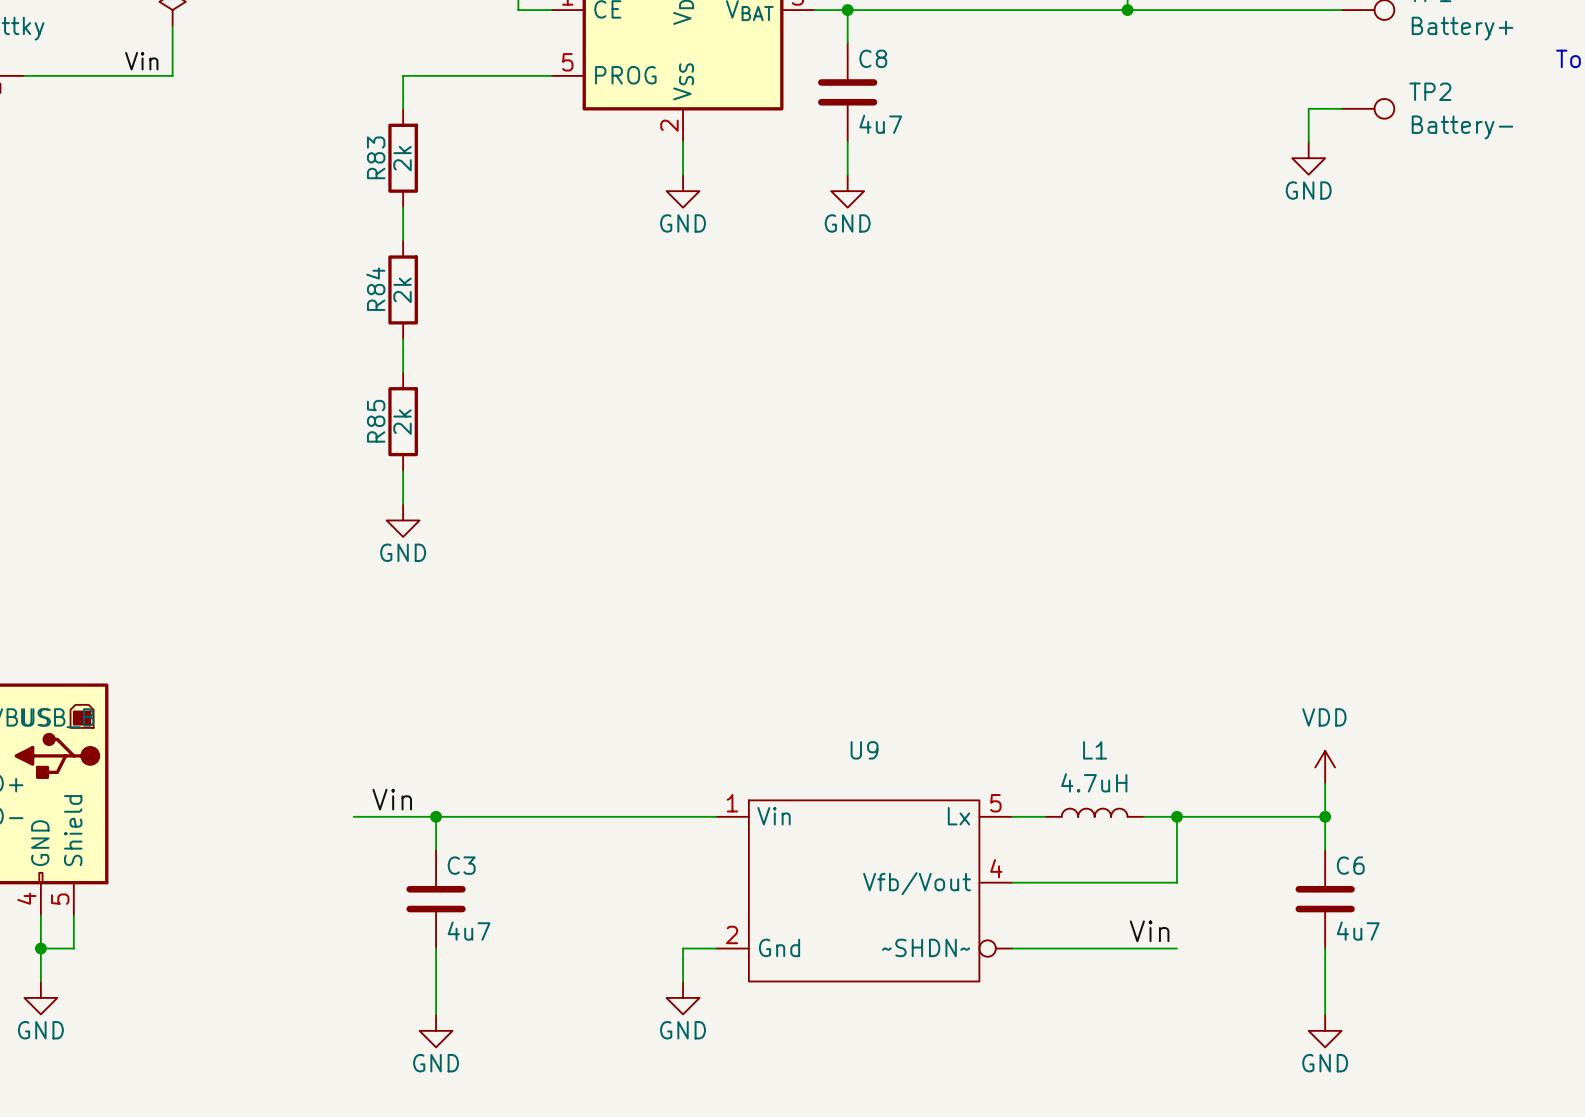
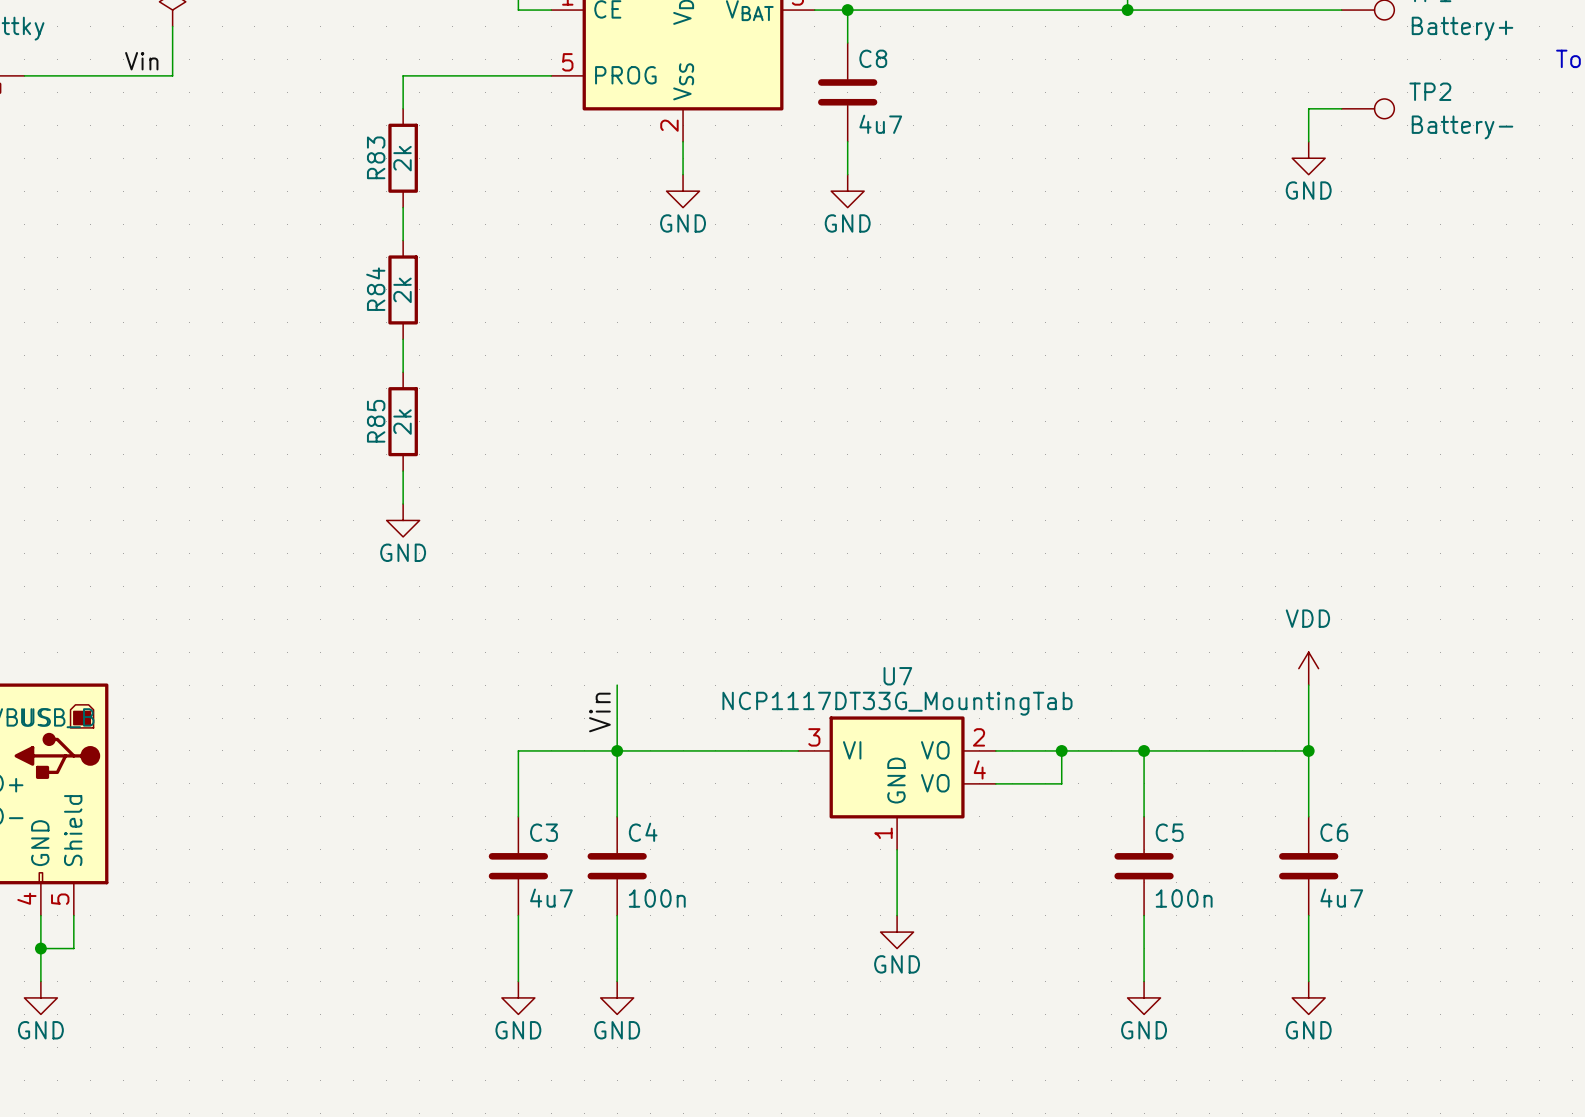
wire: none -> (617, 685) (617, 816)
wire: none -> (1308, 685) (1308, 816)
junction: none -> (617, 750)
wire: none -> (798, 750) (518, 750) (518, 816)
wire: none -> (995, 750) (1308, 750)
wire: none -> (1061, 750) (1061, 783) (995, 783)
junction: none -> (1061, 750)
junction: none -> (1144, 750)
power symbol position: VDD (1325, 767) -> VDD (1308, 668)
U7: none -> NCP1117DT33G_MountingTab (897, 783)
wire: (1325, 783) (1325, 849) -> (1308, 915) (1308, 981)
label rotation: 0° (392, 799) -> 90° counterclockwise (599, 712)
label position: Vin (392, 799) -> Vin (599, 712)
L1: 4.7uH (1094, 812) -> none
wire: (353, 816) (715, 816) -> none
wire: (436, 816) (436, 849) -> none
junction: (436, 816) -> none
wire: (1012, 816) (1045, 816) -> none
wire: (1144, 816) (1325, 816) -> (1144, 816) (1144, 750)
wire: (1176, 816) (1176, 882) (1012, 882) -> none
junction: (1176, 816) -> none
junction position: (1325, 816) -> (1308, 750)
wire: none -> (897, 849) (897, 915)
C4: none -> 100n (617, 866)
C5: none -> 100n (1144, 866)
U9: (864, 890) -> none
C3 position: (436, 899) -> (518, 866)
C6 position: (1325, 899) -> (1308, 866)
wire: none -> (617, 915) (617, 981)
label: Vin (1149, 931) -> none
power symbol: none -> GND (897, 932)
wire: (436, 948) (436, 1014) -> (518, 915) (518, 981)
wire: (715, 948) (683, 948) (683, 981) -> none
wire: (1012, 948) (1176, 948) -> none
wire: (1325, 948) (1325, 1014) -> (1144, 915) (1144, 981)
power symbol: none -> GND (518, 997)
power symbol position: GND (683, 997) -> GND (617, 997)
power symbol: none -> GND (1144, 997)
power symbol: GND (436, 1030) -> none
power symbol position: GND (1325, 1030) -> GND (1308, 997)

